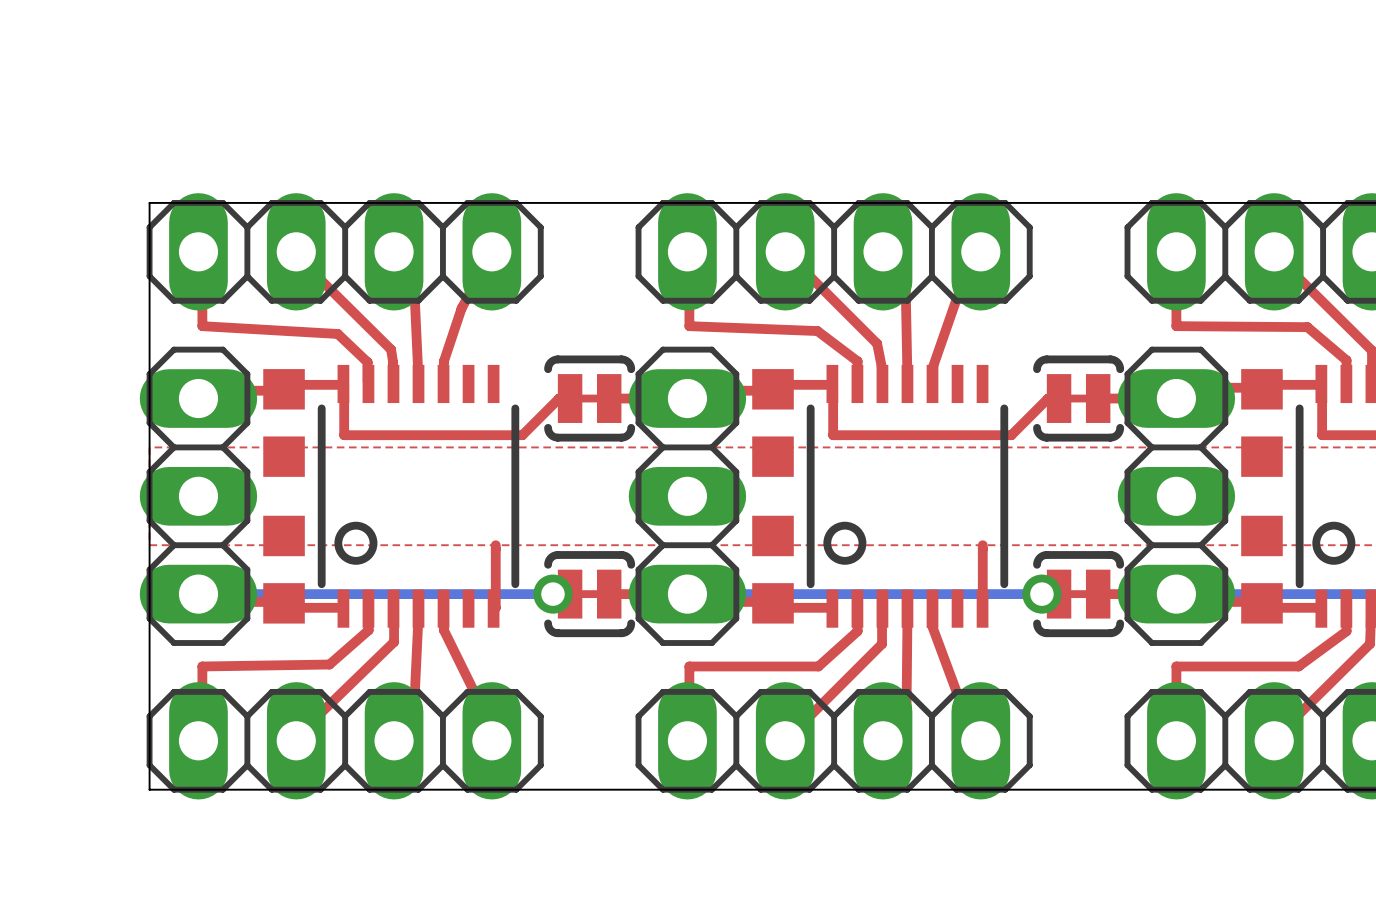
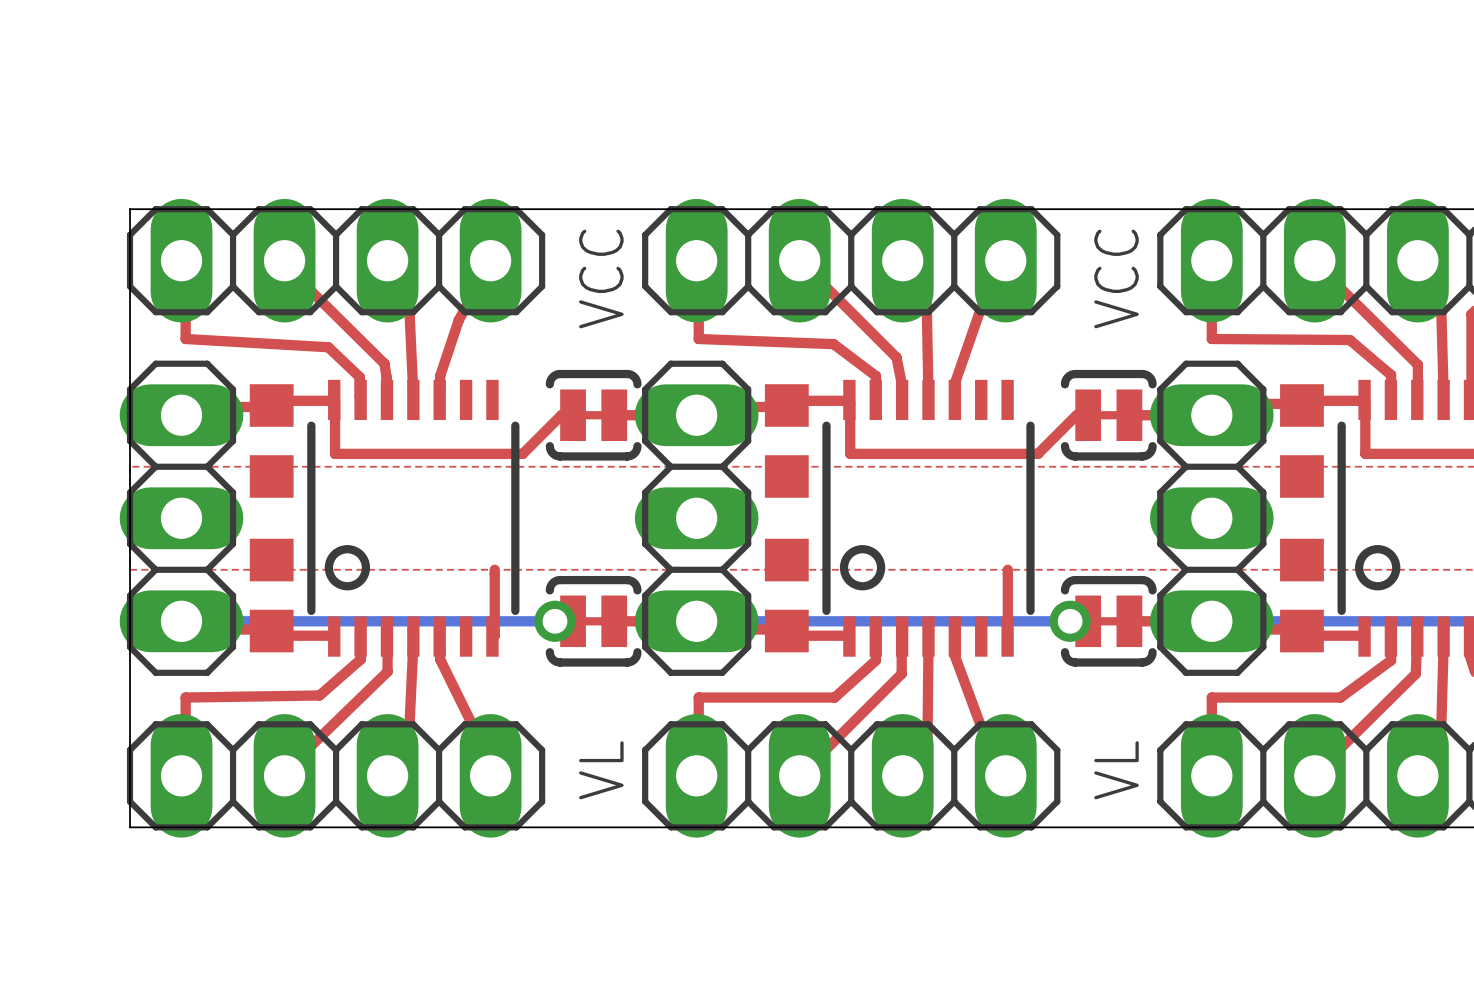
text: none -> VCC (601, 278)
text: none -> VCC (1116, 278)
text: none -> VL (601, 770)
text: none -> VL (1116, 770)

